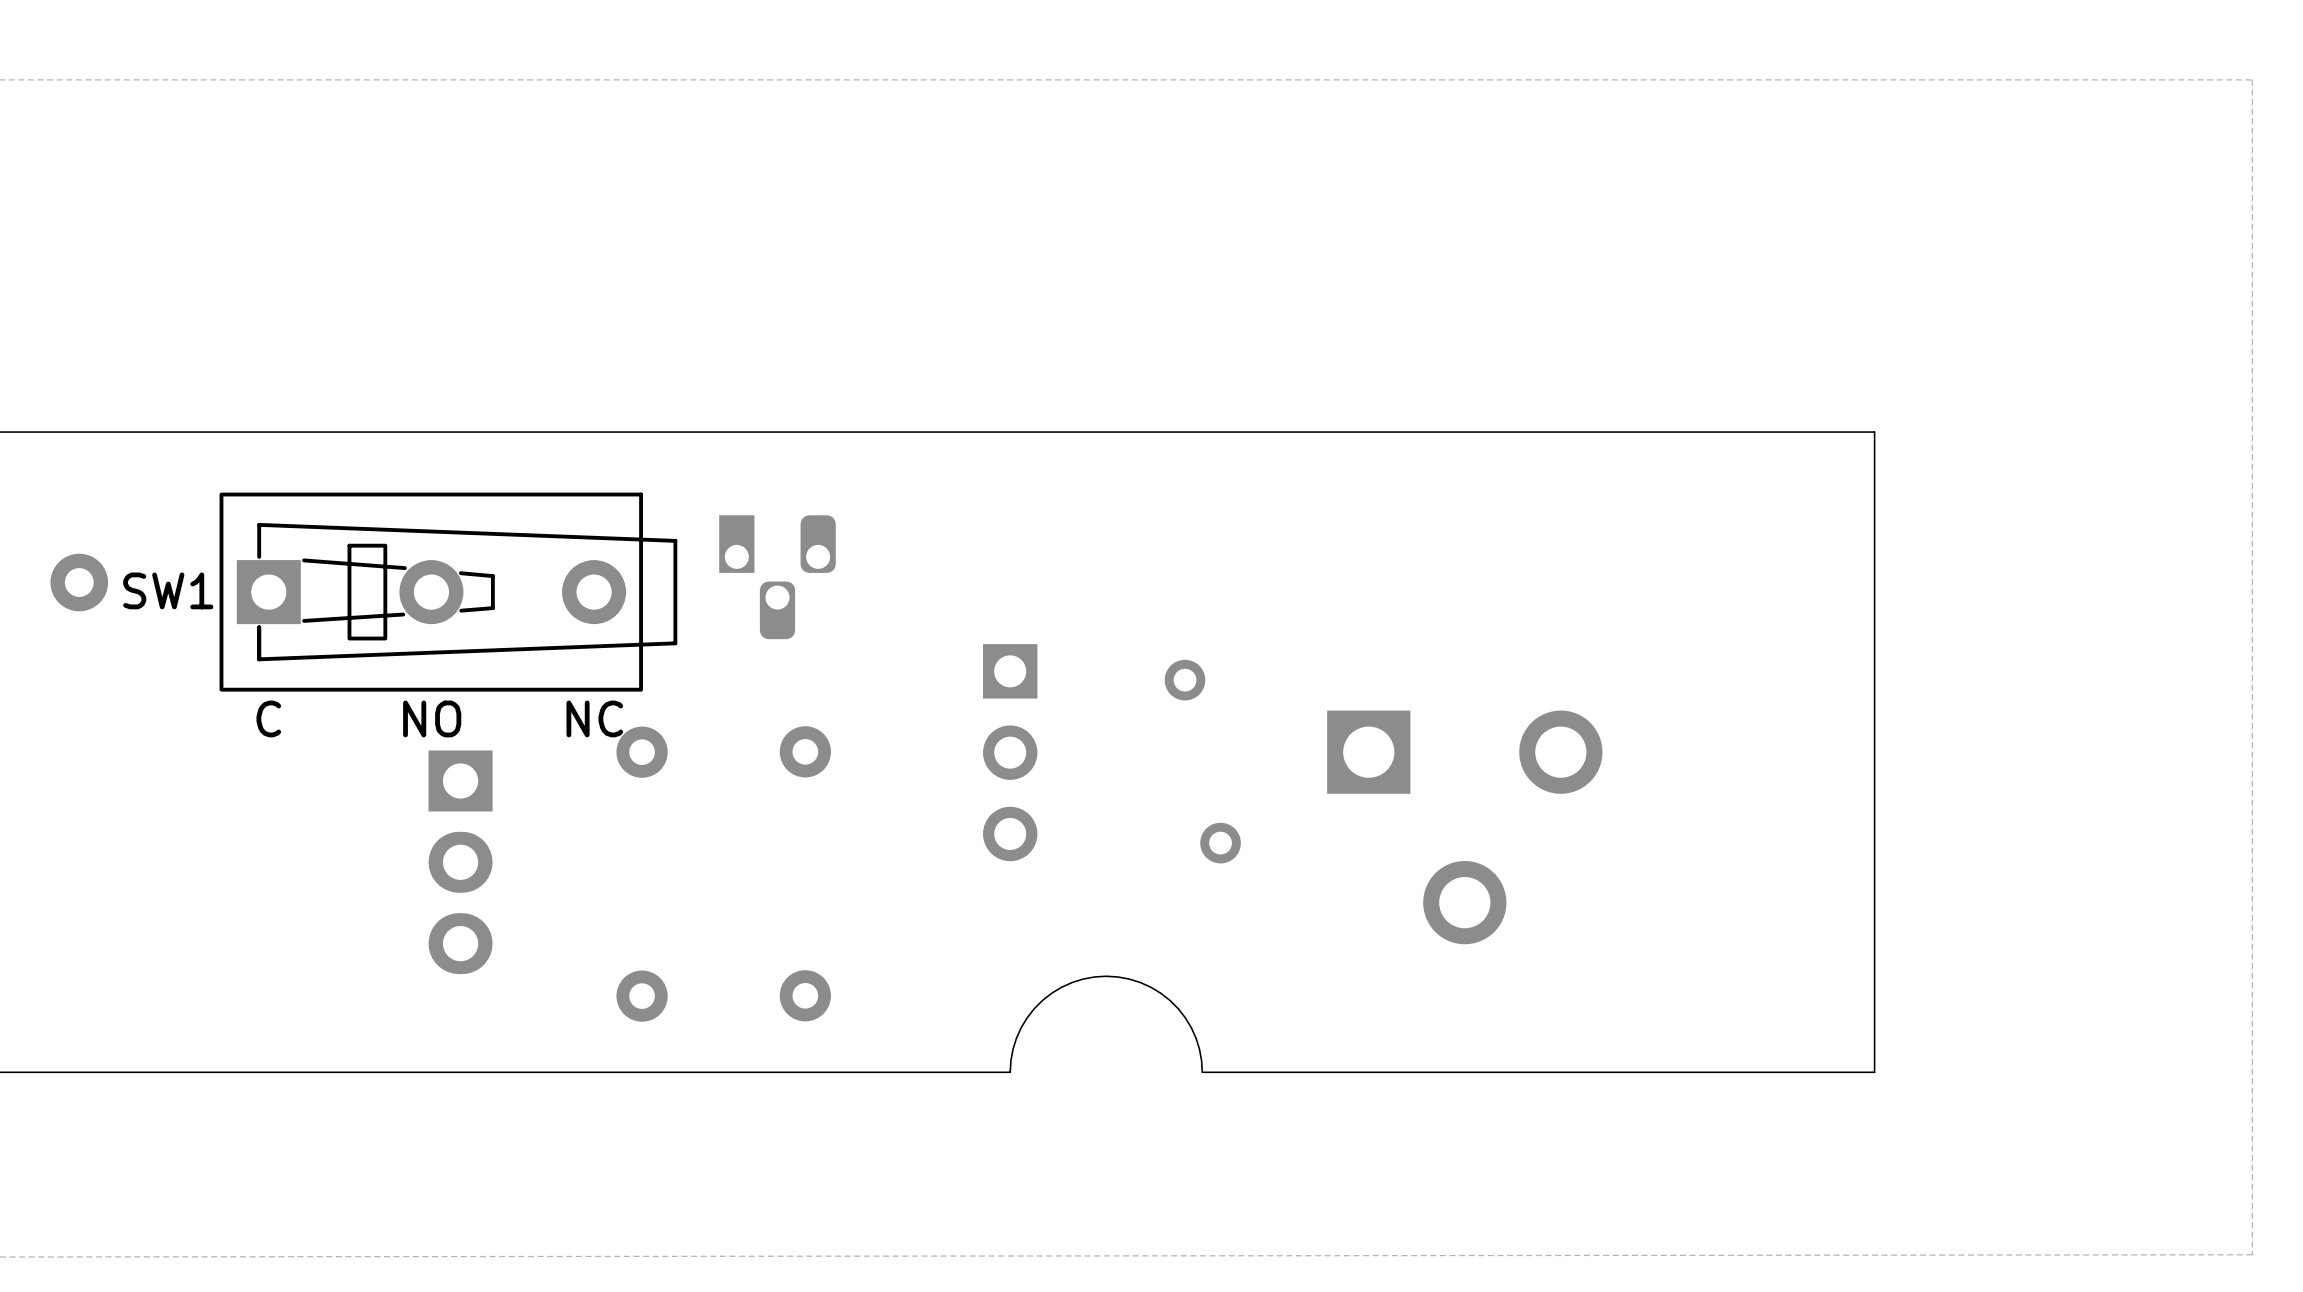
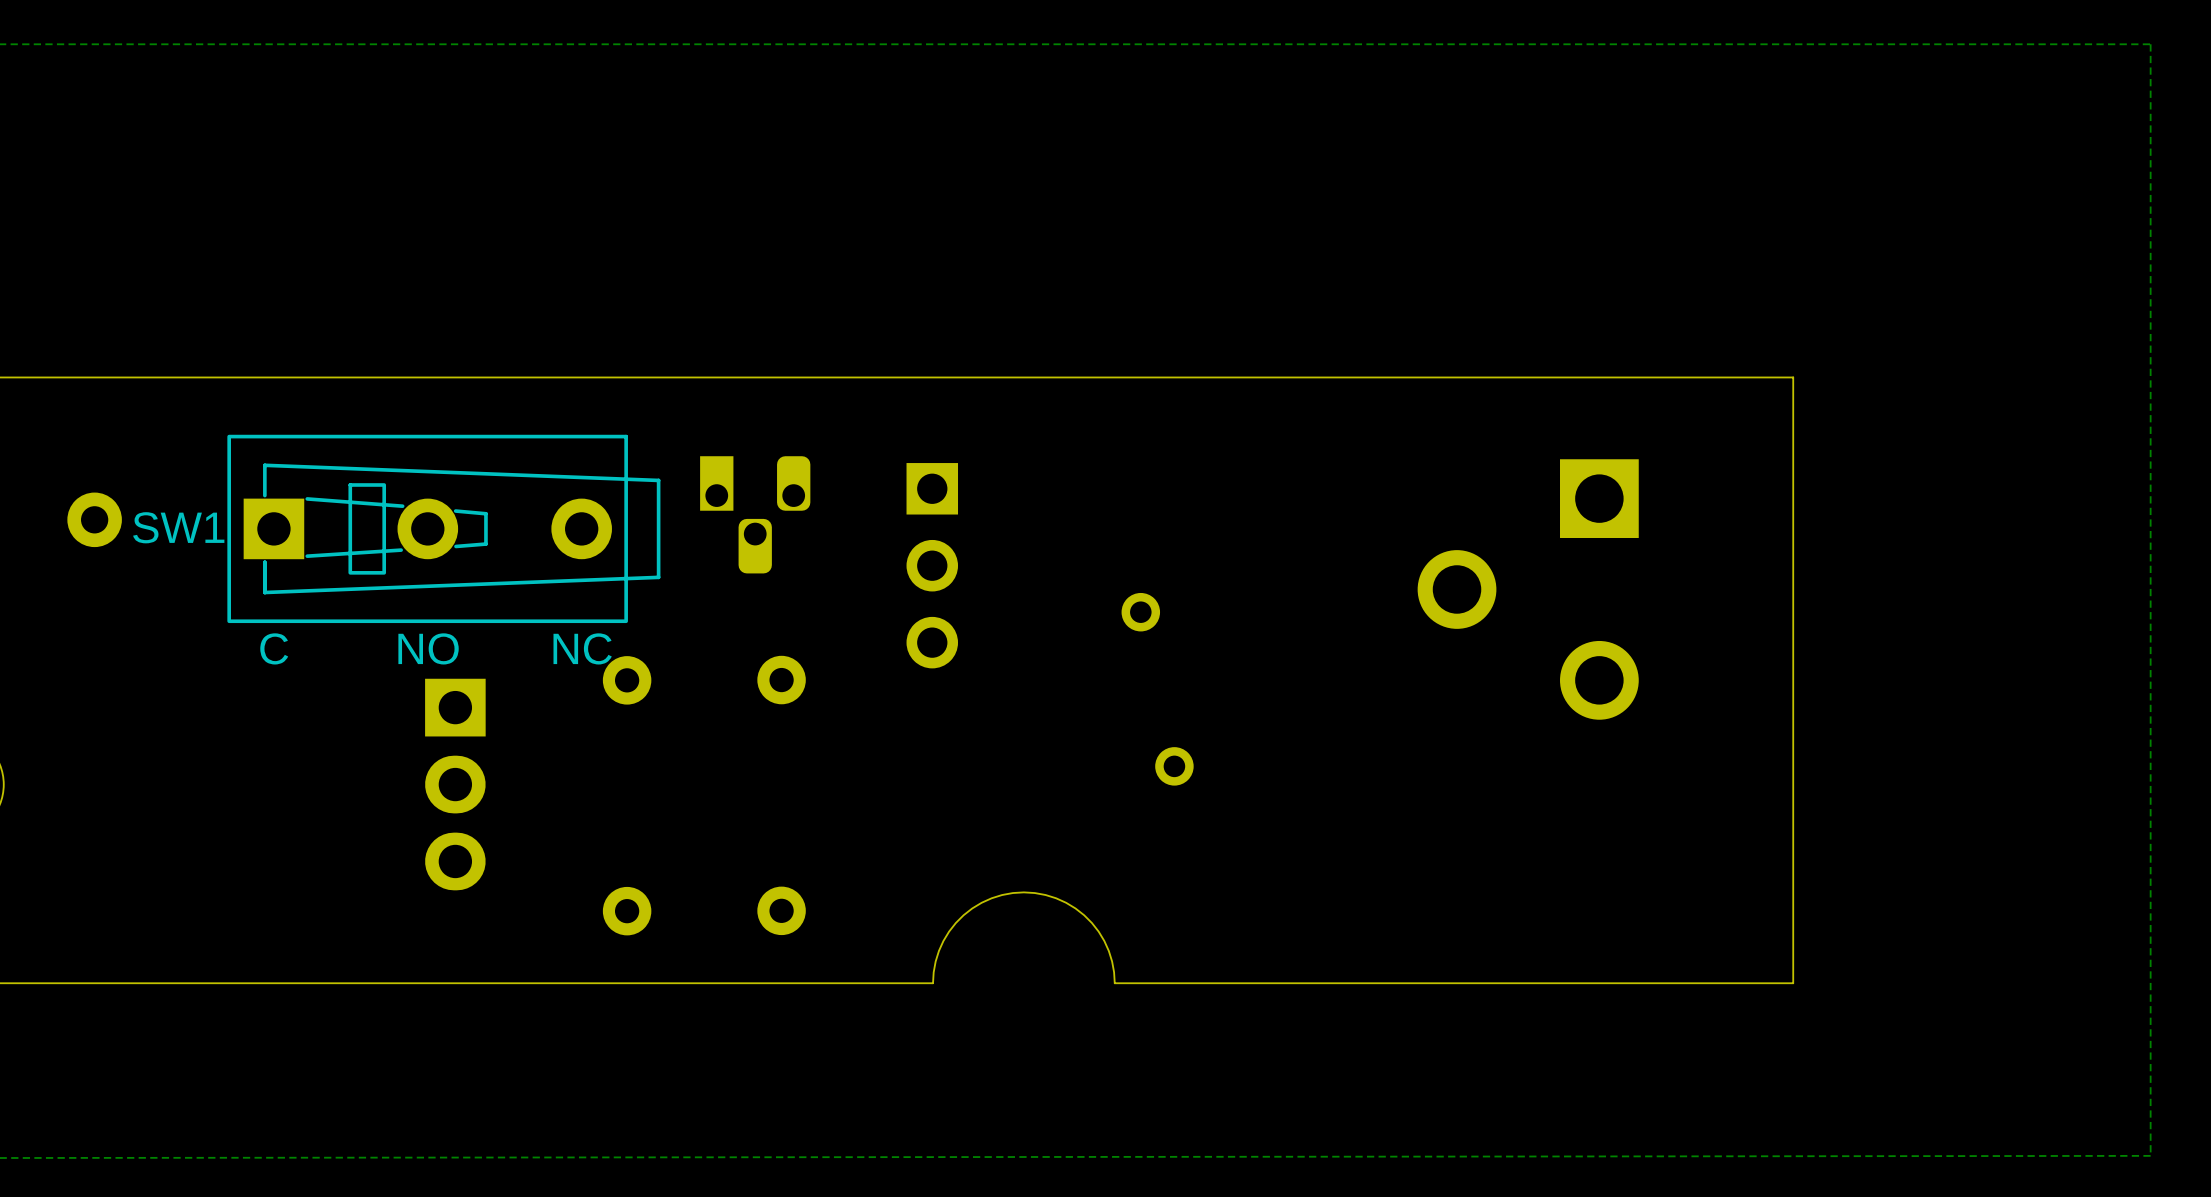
part position: (1010, 752) -> (932, 565)
part rotation: 0° (1464, 827) -> 90° clockwise (1528, 589)
part position: (1464, 827) -> (1528, 589)
board edge: (1202, 1072) (1199, 1049) (1191, 1027) (1169, 1000) (1140, 982) (1106, 976) (1072, 982) (1042, 1000) (1021, 1027) (1013, 1049) (1010, 1072) (965, 1072) -> (1157, 983) (1114, 983) (1108, 951) (1098, 931) (1084, 915) (1056, 898) (1023, 892) (991, 898) (963, 915) (943, 941) (935, 961) (933, 983)

